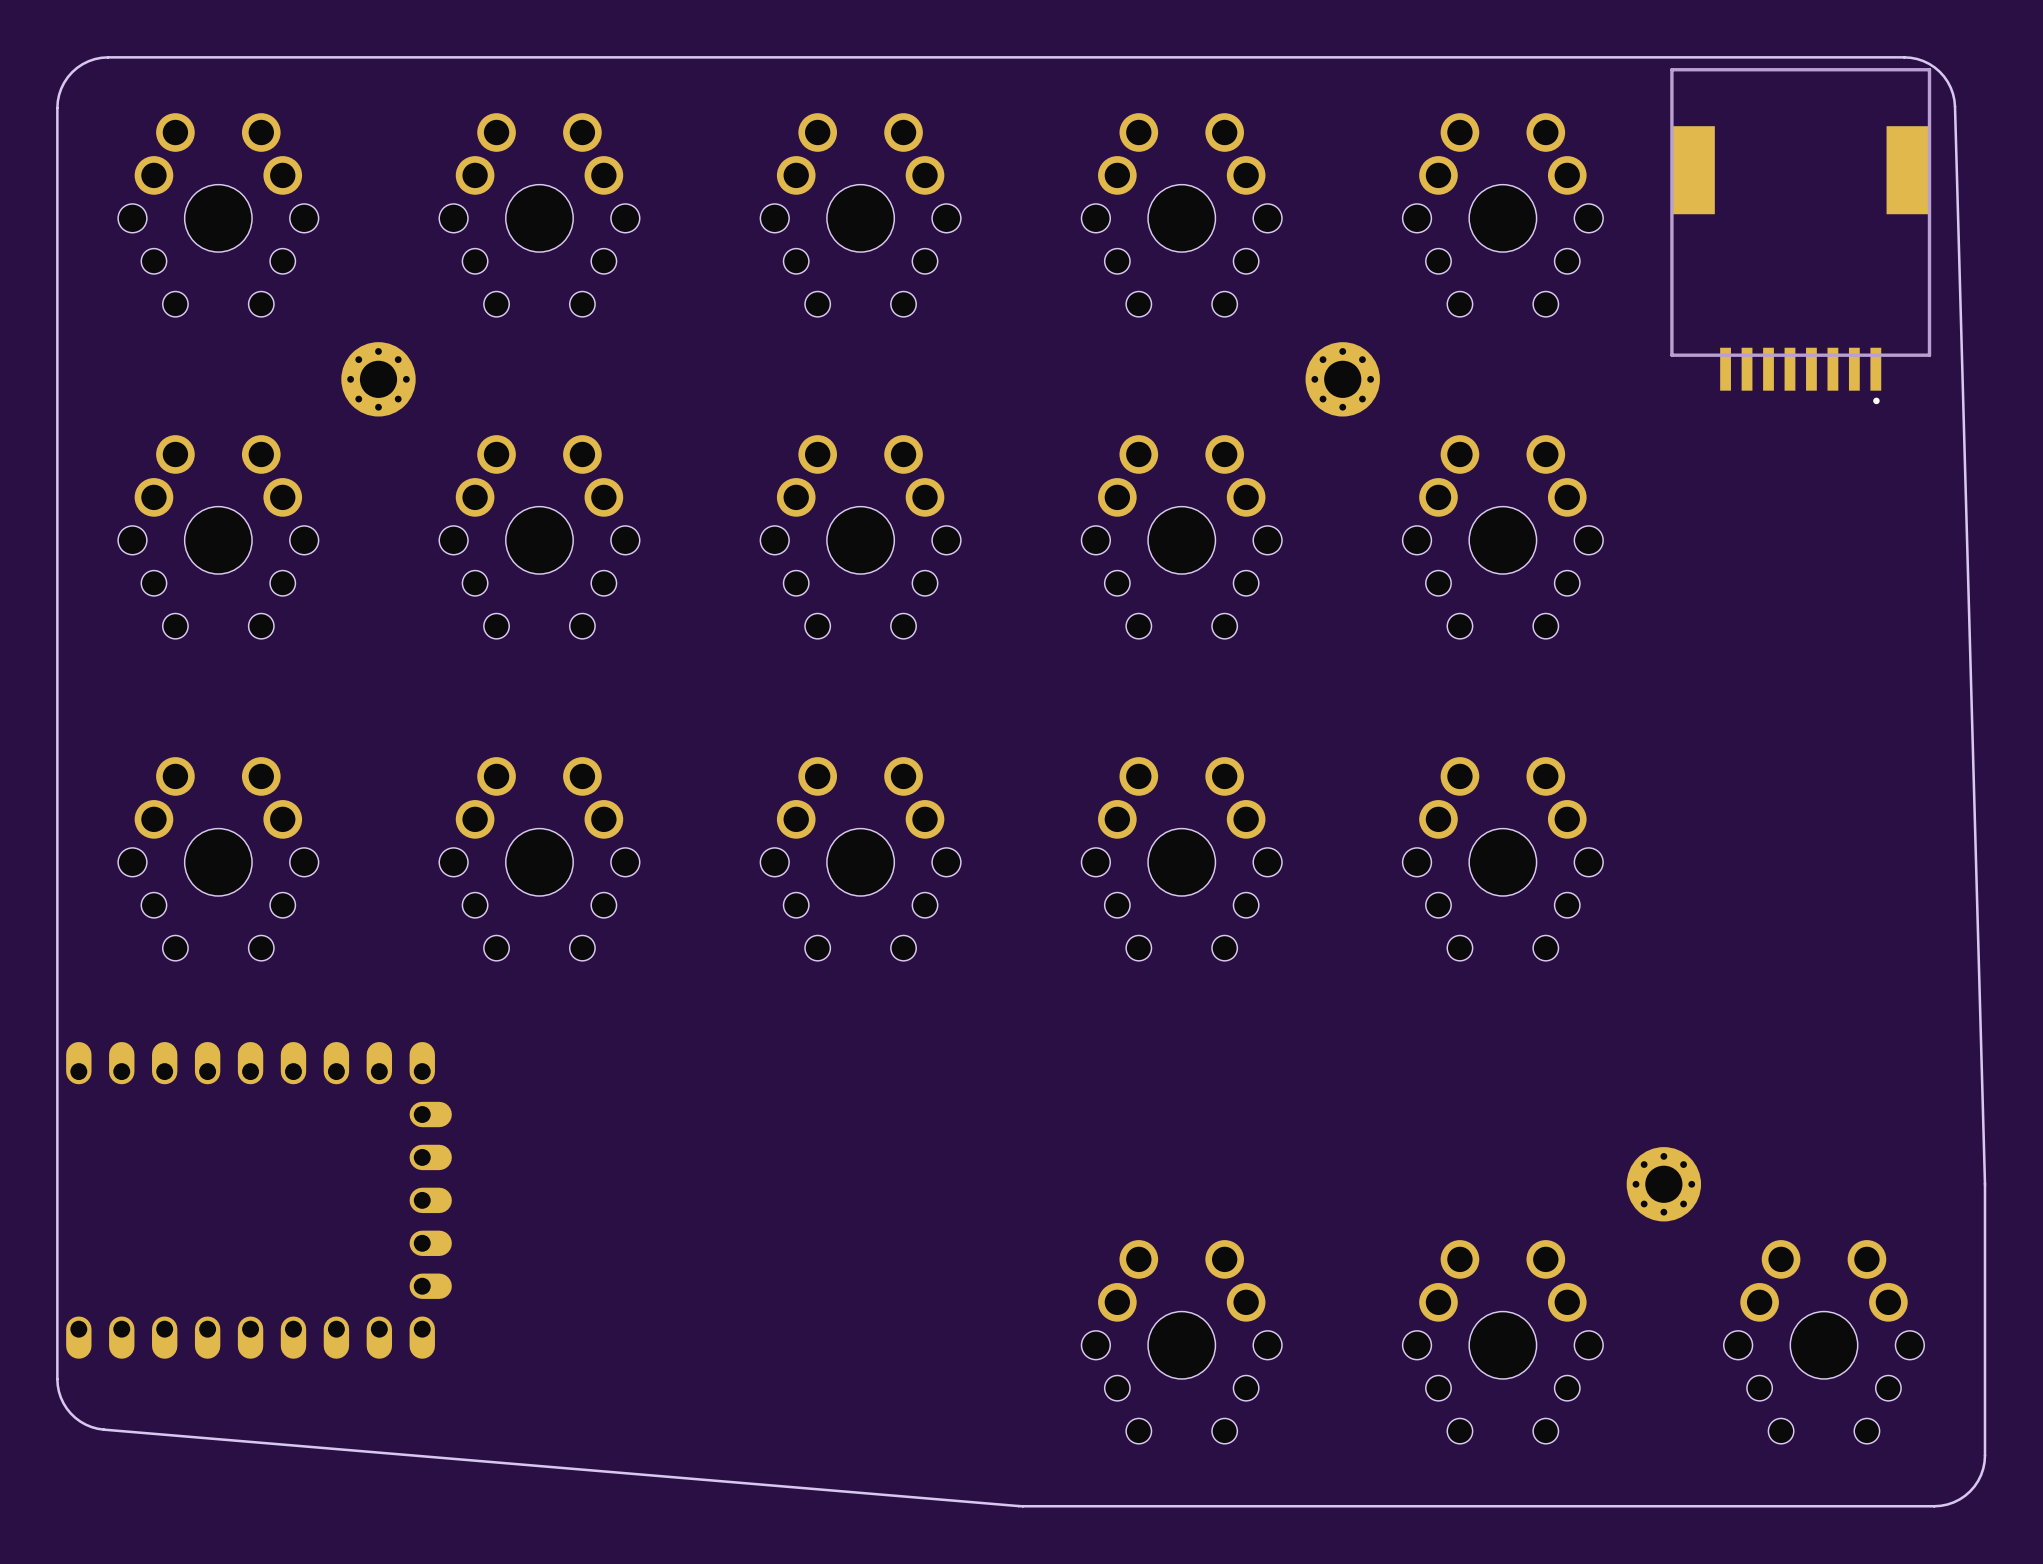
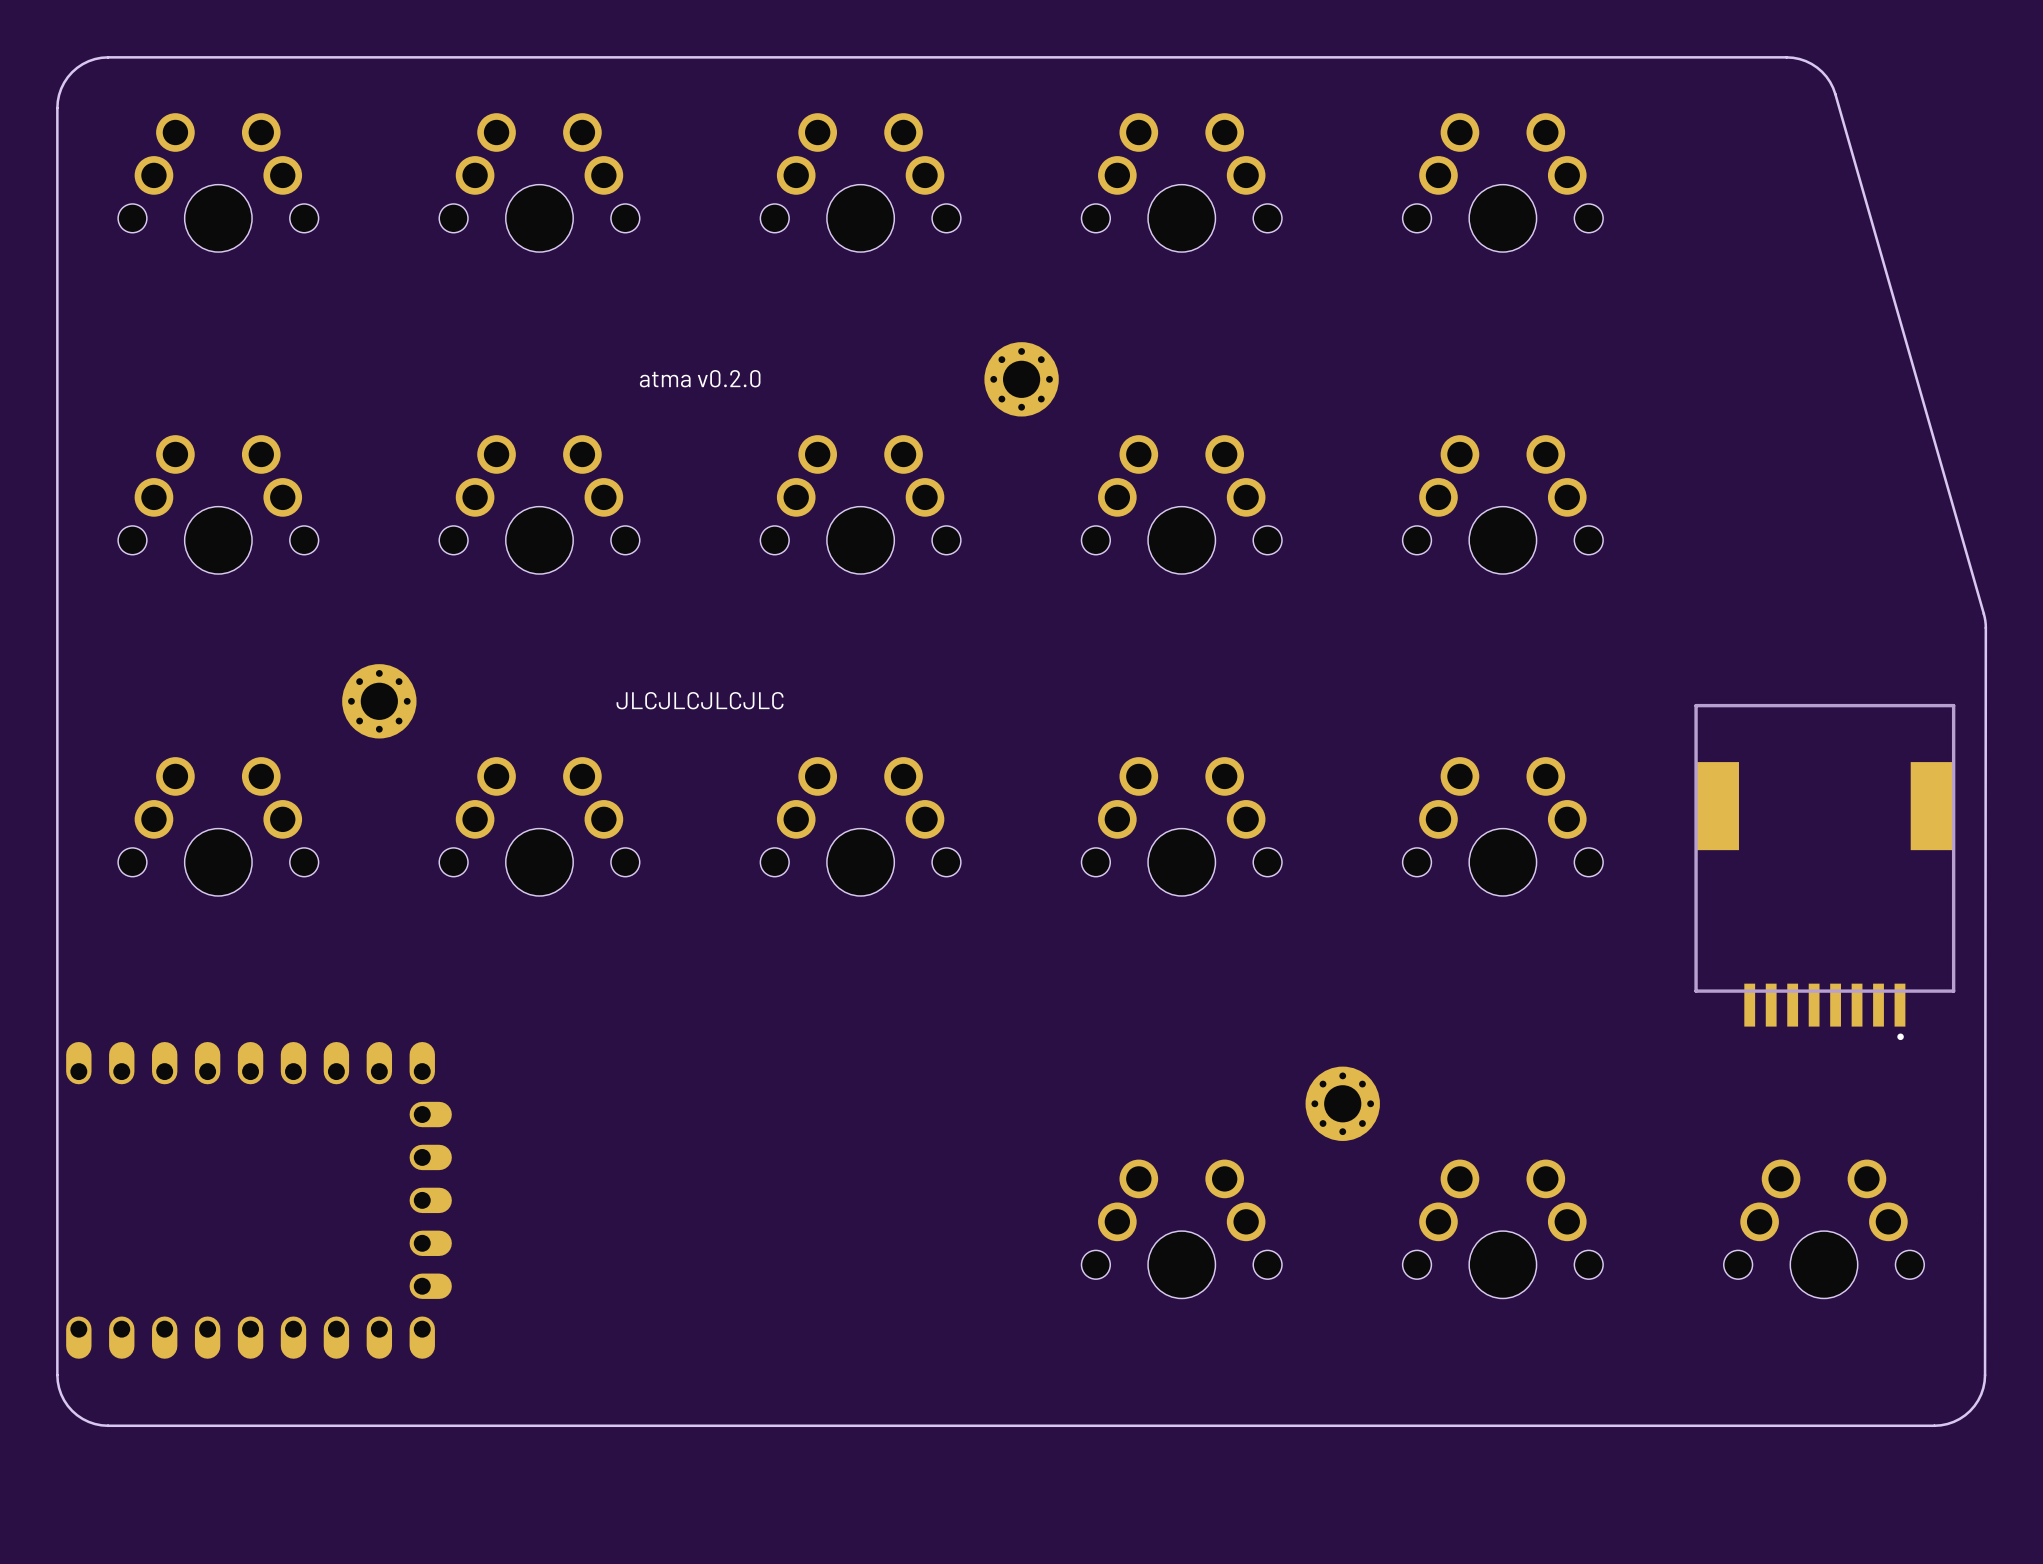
board edge: (1786, 57) (1904, 57) (1917, 59) (1929, 63) (1939, 71) (1950, 87) (1954, 100) (1984, 1184) (1984, 1455) (1981, 1474) (1974, 1486) (1965, 1495) (1953, 1502) (1934, 1506) (1018, 1506) (103, 1429) (85, 1424) (70, 1413) (60, 1397) (57, 1375) -> (1786, 57) (1805, 61) (1817, 67) (1826, 76) (1835, 94) (1985, 620) (1985, 1375) (1981, 1394) (1974, 1405) (1965, 1415) (1947, 1424) (1934, 1425) (108, 1425) (88, 1421) (72, 1410) (61, 1394) (57, 1375)
part: (218, 215) -> none
part: (539, 215) -> none
part: (860, 215) -> none
part: (1181, 215) -> none
part: (1502, 215) -> none
part: (1800, 236) -> none
text: none -> atma v0.2.0 (700, 378)
part: (378, 379) -> none
part position: (1342, 379) -> (1021, 379)
part: (218, 537) -> none
part: (539, 537) -> none
part: (860, 537) -> none
part: (1181, 537) -> none
part: (1502, 537) -> none
text: none -> JLCJLCJLCJLC (700, 700)
part: none -> (379, 701)
part: (218, 858) -> none
part: (539, 858) -> none
part: (860, 858) -> none
part: (1181, 858) -> none
part: (1502, 858) -> none
part: none -> (1824, 871)
part position: (1663, 1184) -> (1342, 1103)
part: none -> (1181, 1229)
part: none -> (1502, 1229)
part: none -> (1824, 1229)
part: (1181, 1341) -> none
part: (1502, 1341) -> none
part: (1824, 1341) -> none

